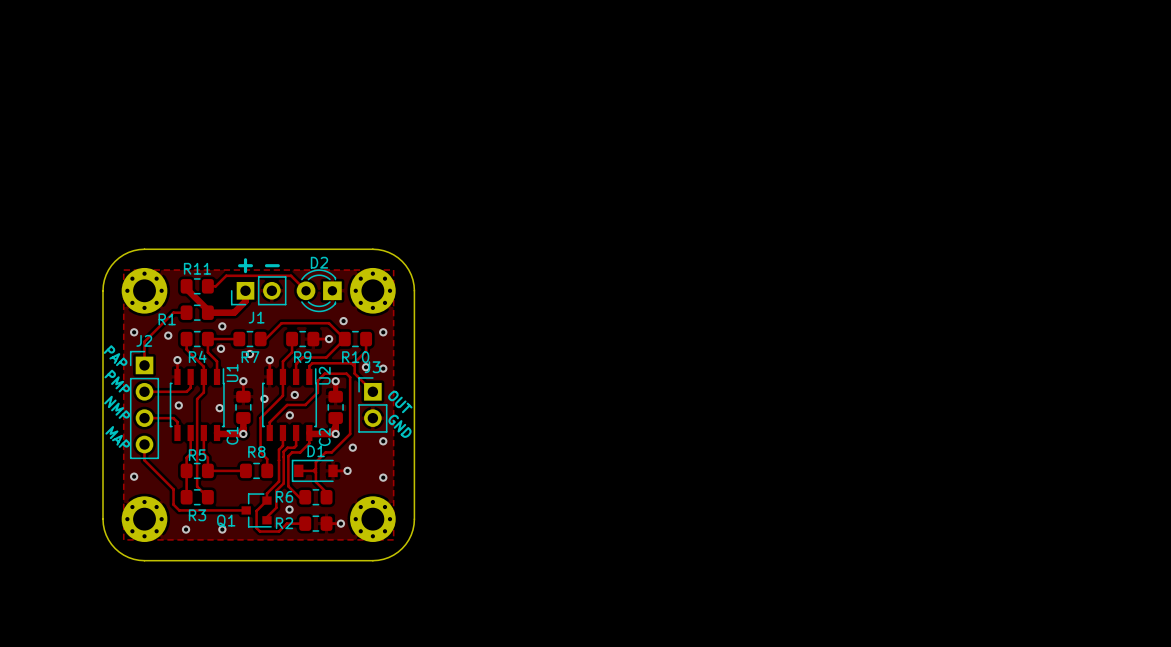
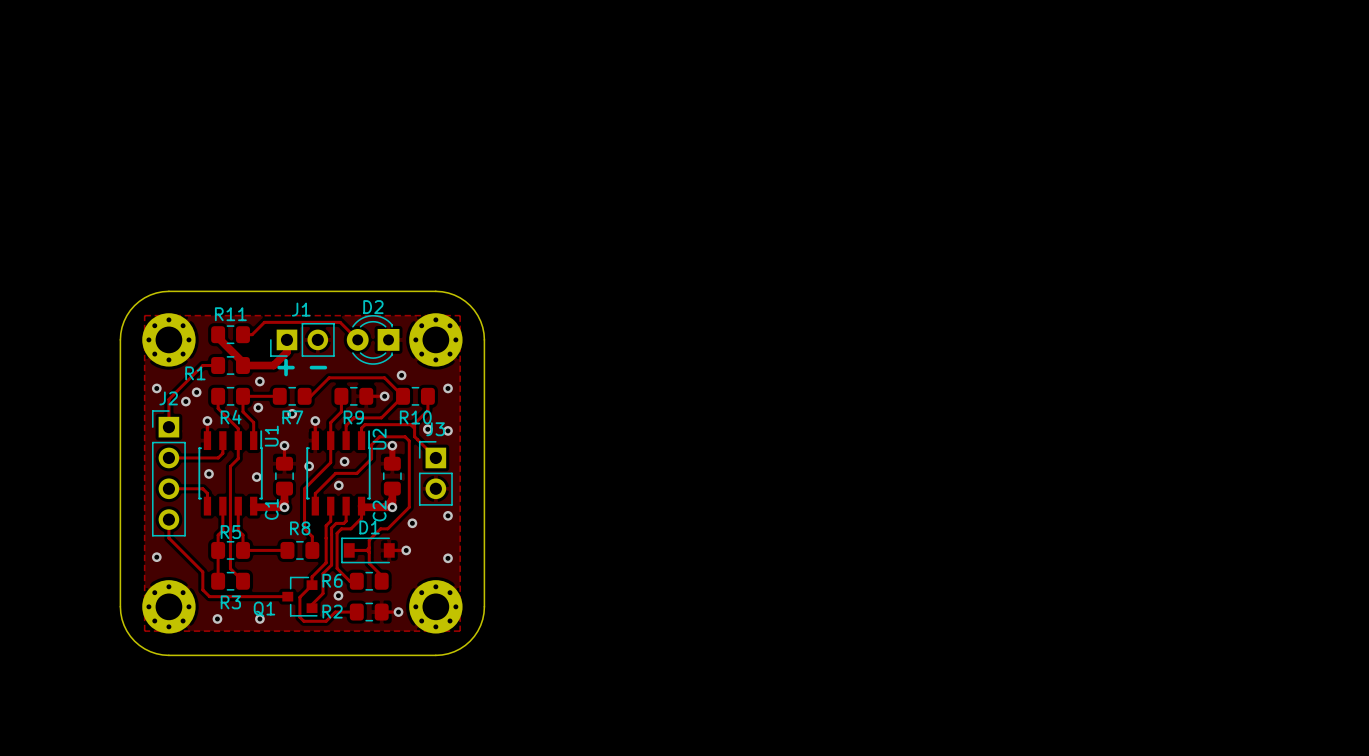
text position: + (245, 265) -> + (286, 367)
text position: - (272, 265) -> - (318, 367)
J1 name position: J1 (256, 317) -> J1 (301, 309)
via: none -> (185, 401)
text: PAP (115, 355) -> none
text: PMP (117, 381) -> none
text: OUT (400, 401) -> none
text: NMP (117, 407) -> none
text: GND (399, 426) -> none
text: MAP (117, 436) -> none

